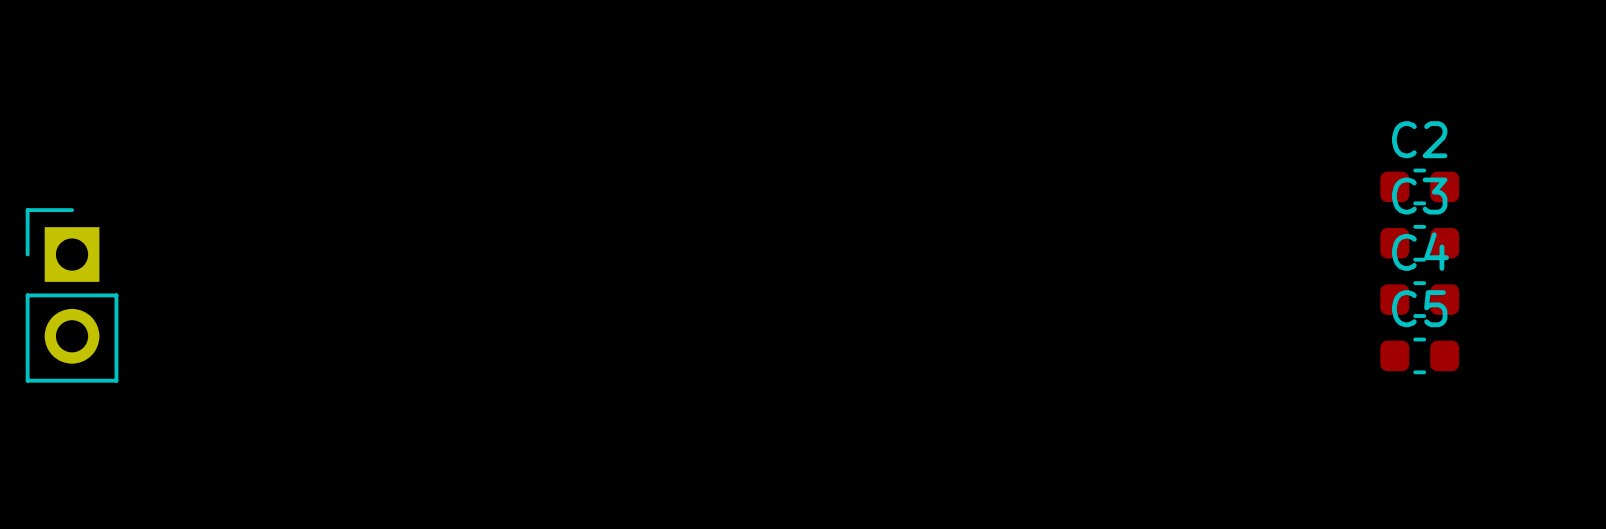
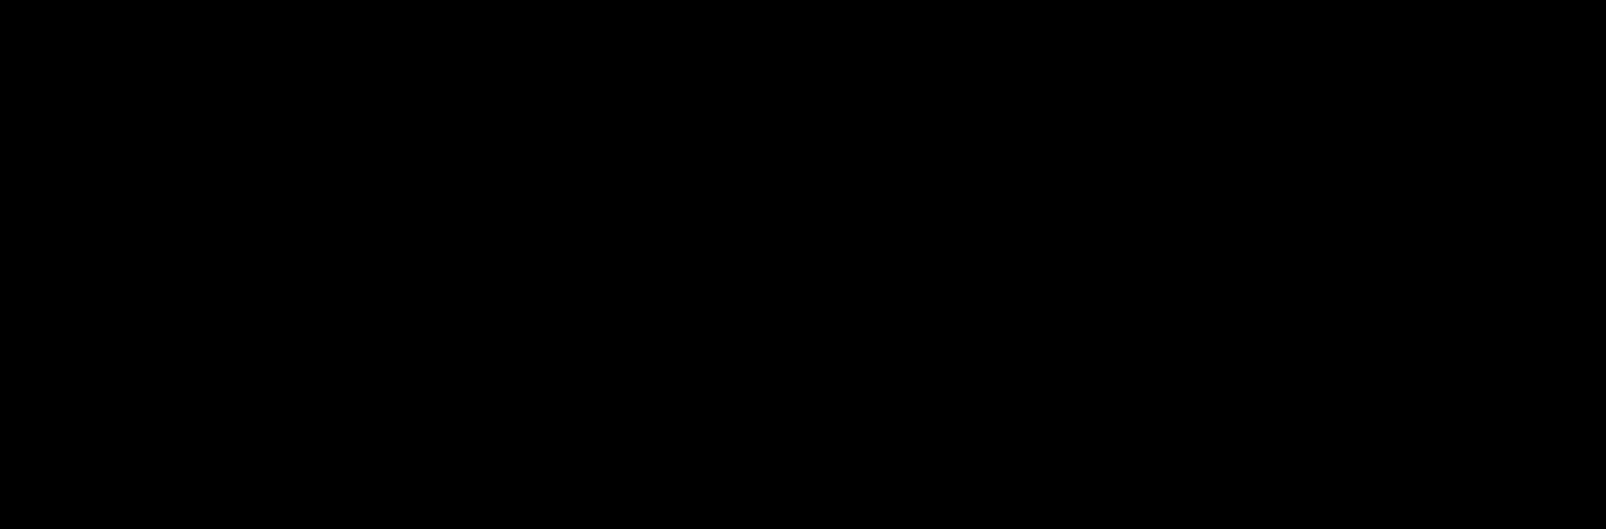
C2: (1419, 186) -> none
C3: (1419, 243) -> none
part: (72, 295) -> none
C4: (1419, 299) -> none
C5: (1419, 355) -> none

